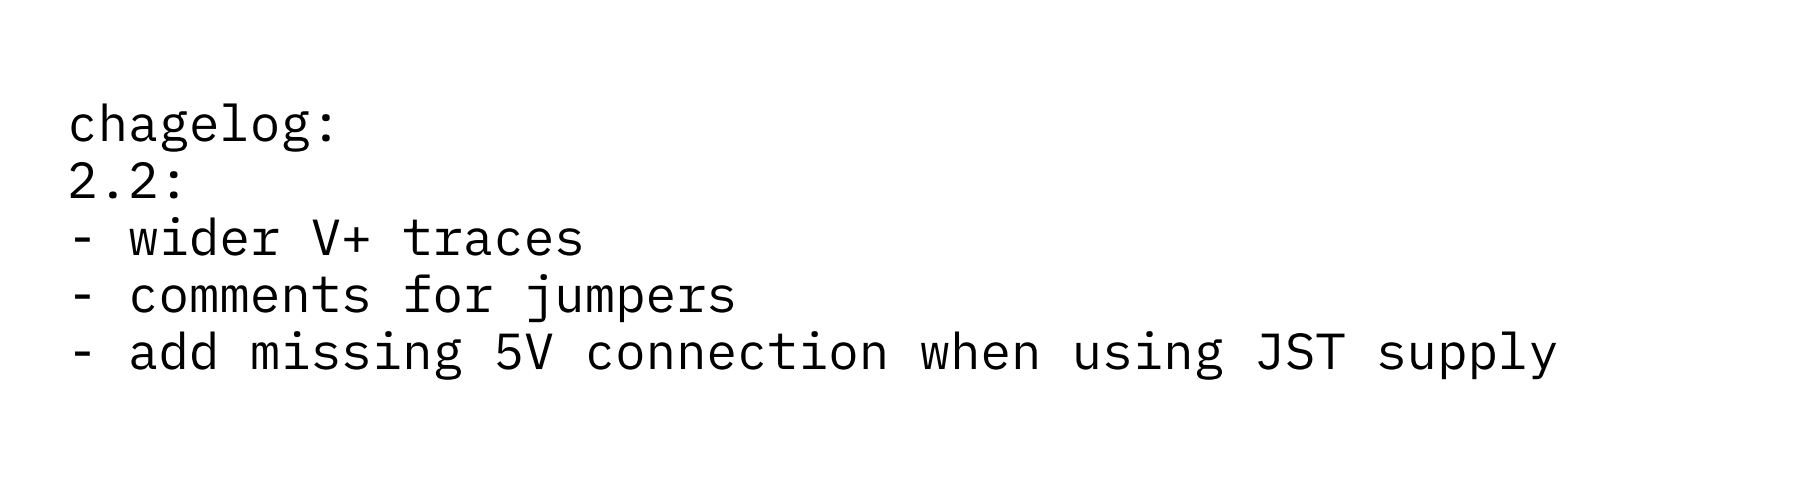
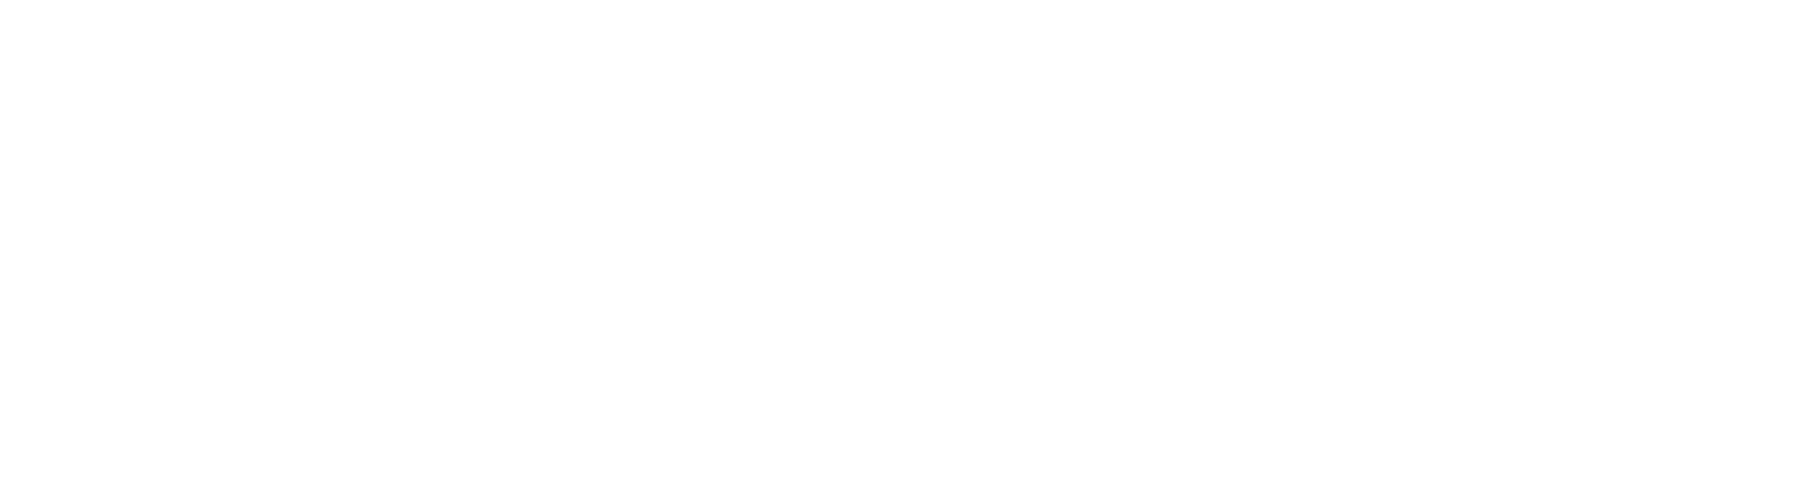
text: chagelog: (200, 127) -> none
text: 2.2: (123, 180) -> none
text: - wider V+ traces (327, 236) -> none
text: - comments for jumpers (404, 298) -> none
text: - add missing 5V connection when using JST supply (815, 355) -> none

